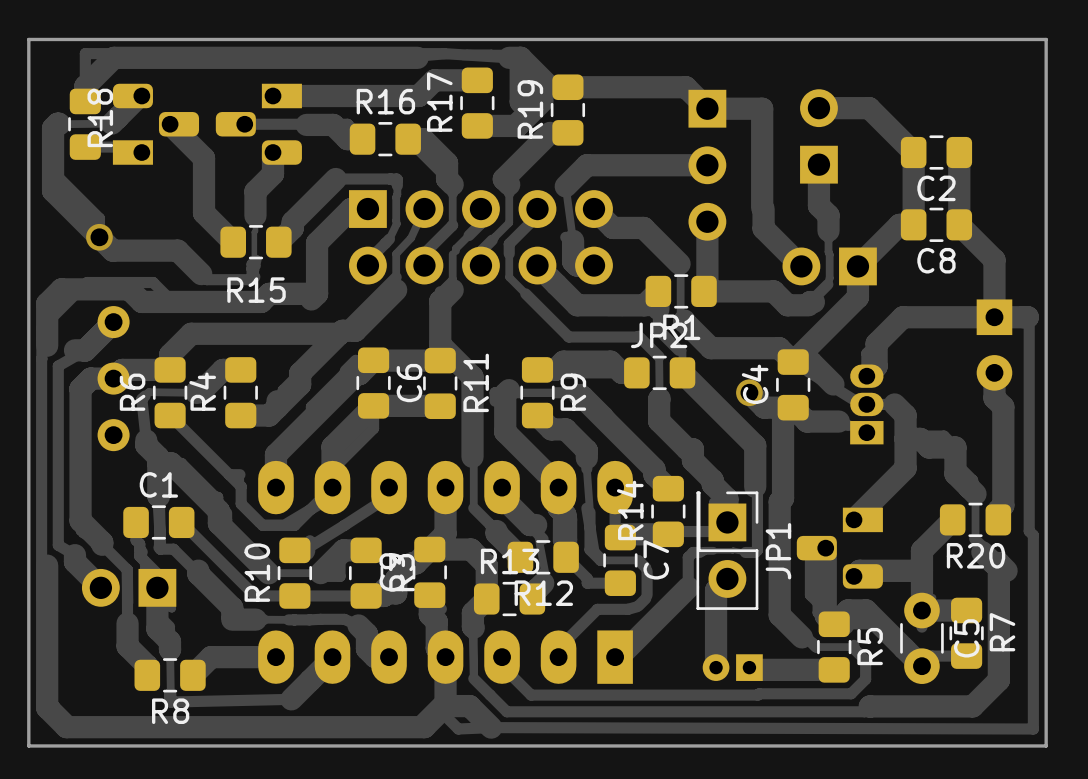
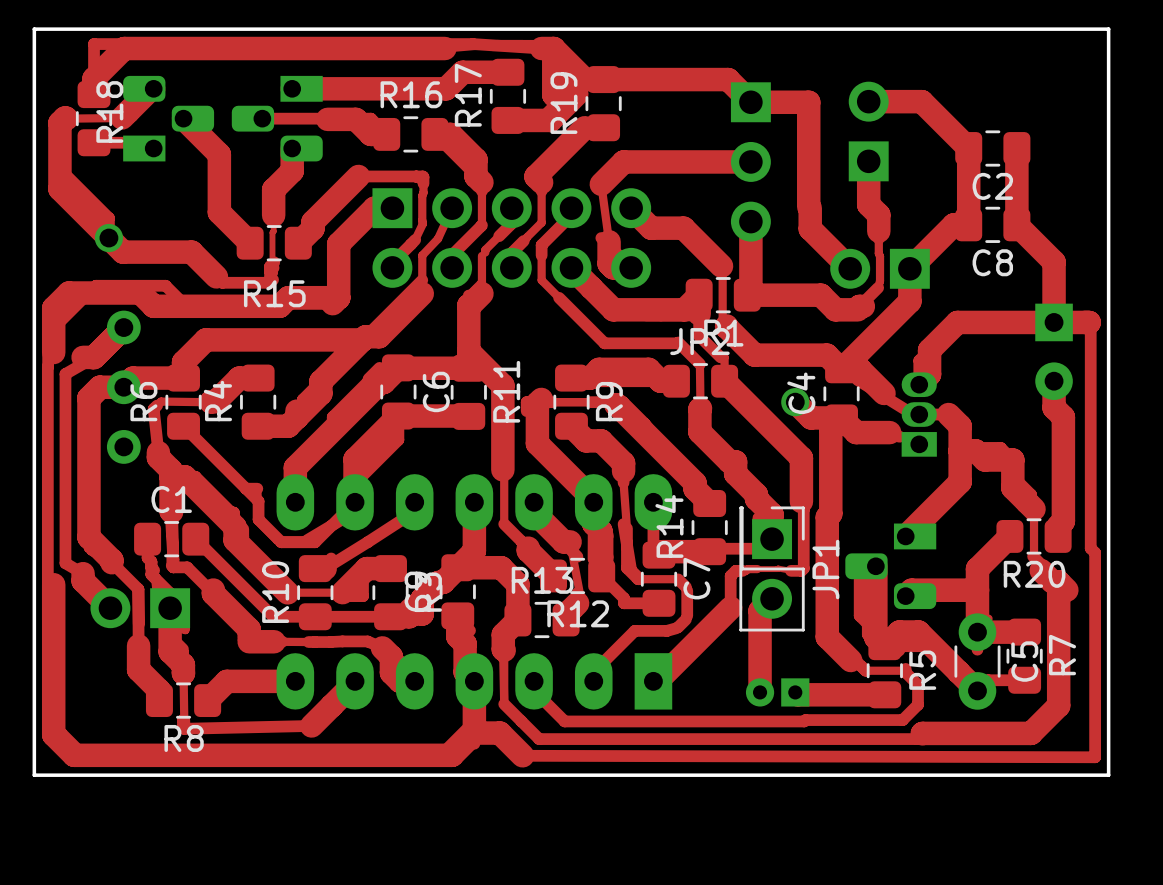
track: (445, 716) (458, 729) (491, 727) -> none

